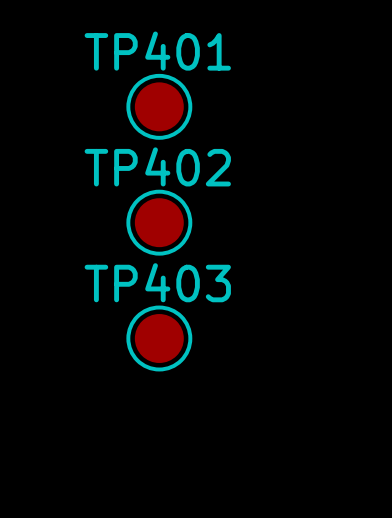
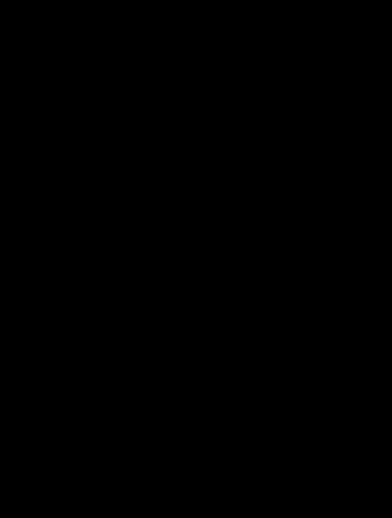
TP401: (159, 106) -> none
TP402: (159, 222) -> none
TP403: (159, 338) -> none

